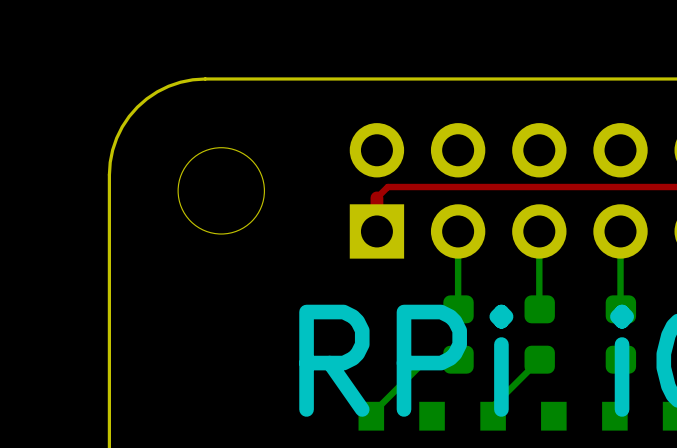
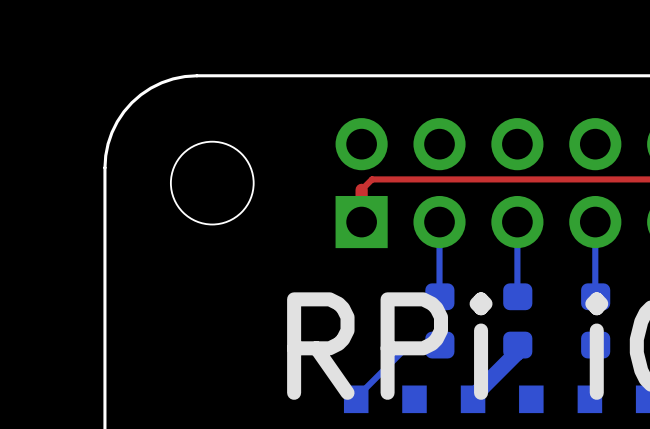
bottom track: none -> (517, 348) (517, 354) (473, 399)

